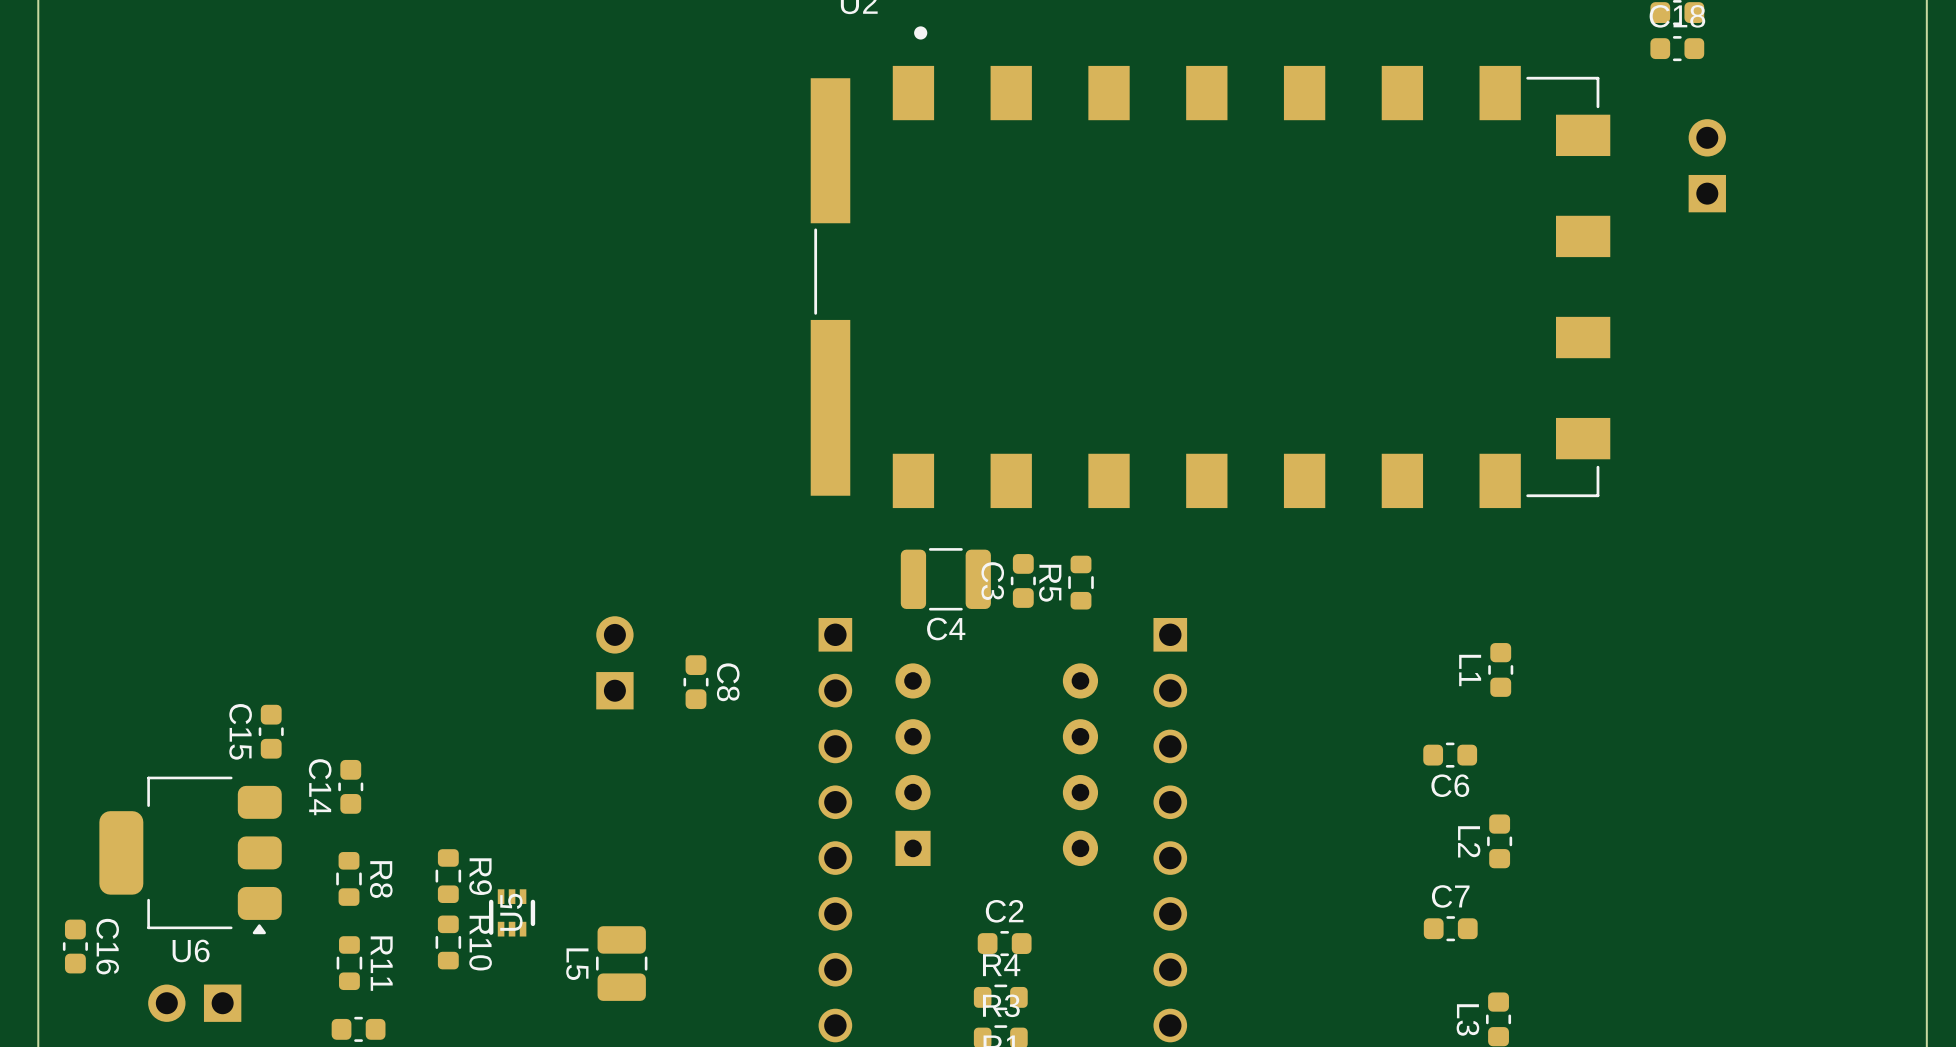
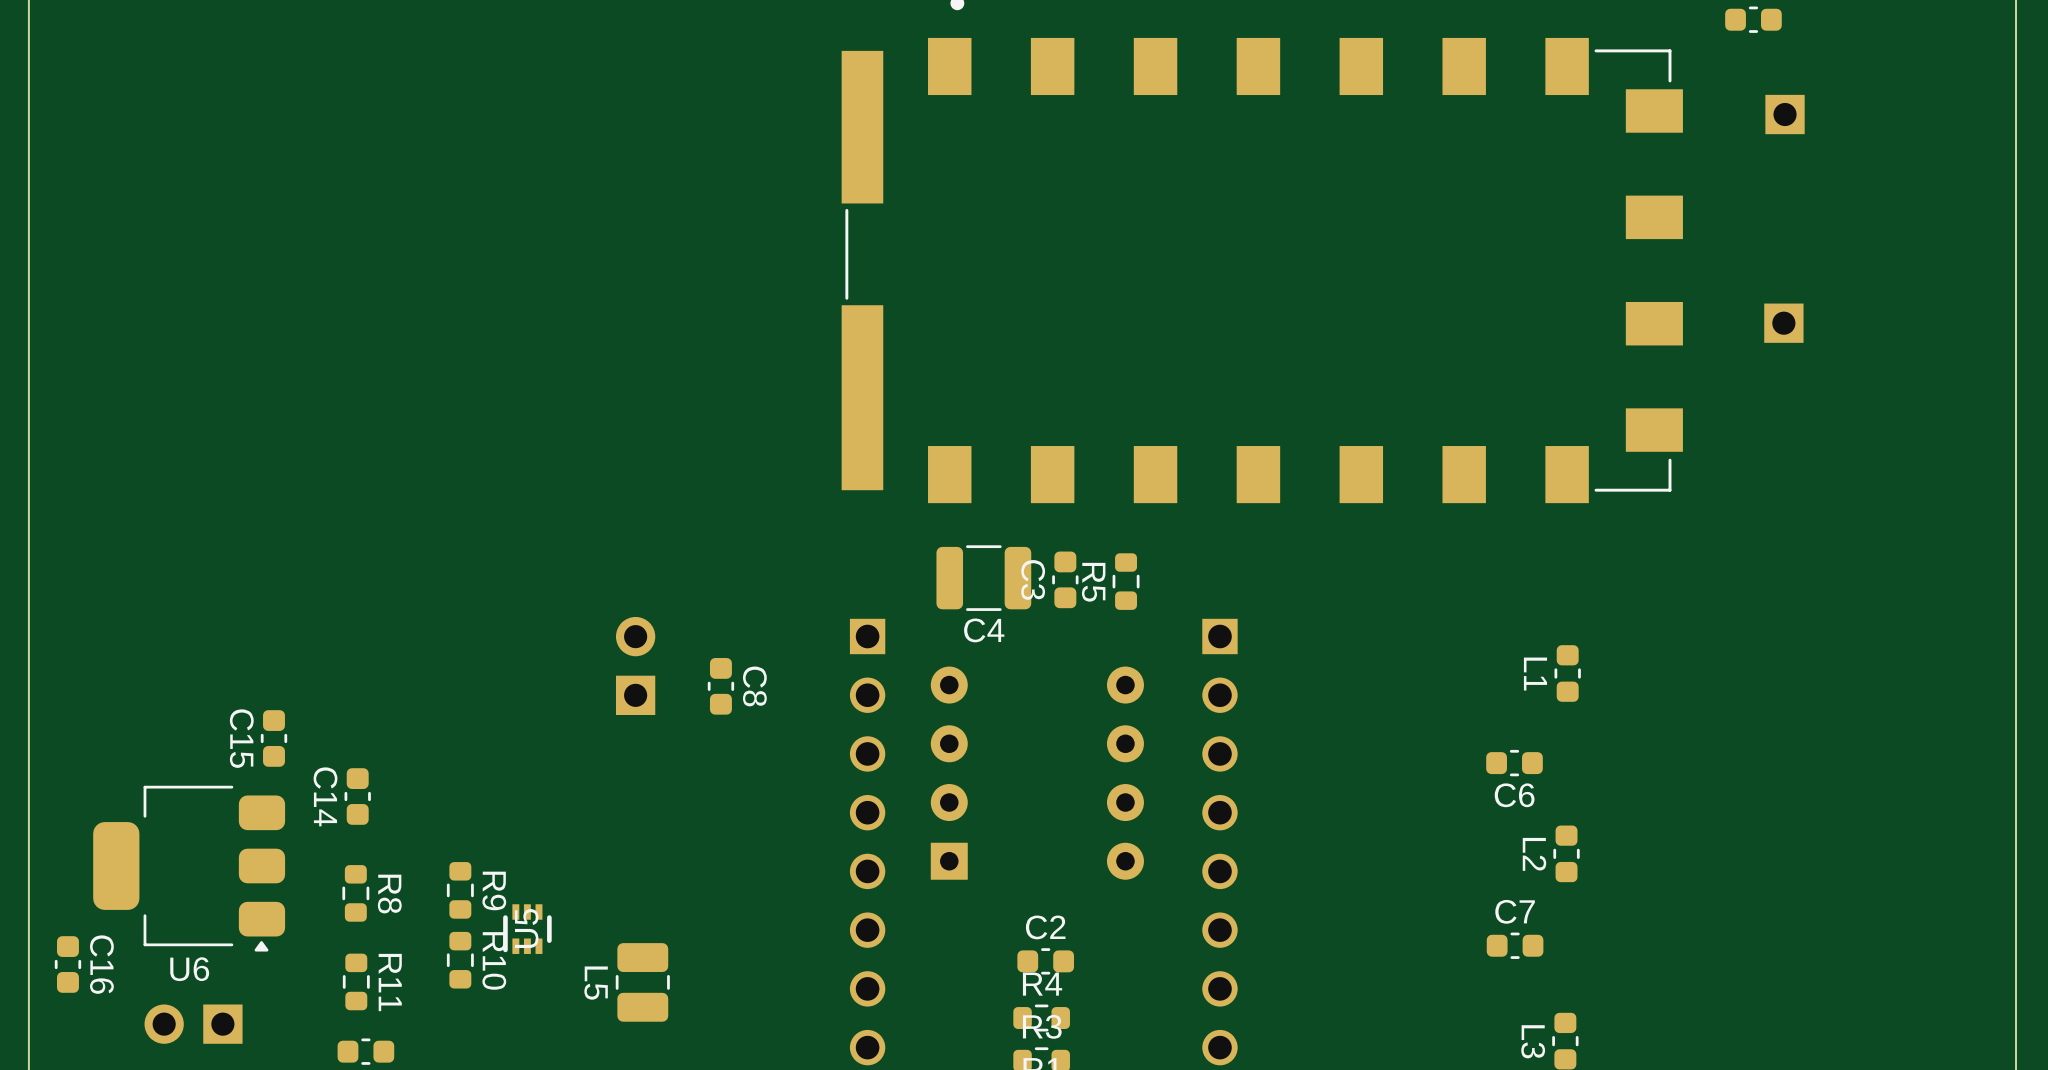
part: none -> (1785, 114)
part: (1707, 165) -> none
part: none -> (1783, 323)

